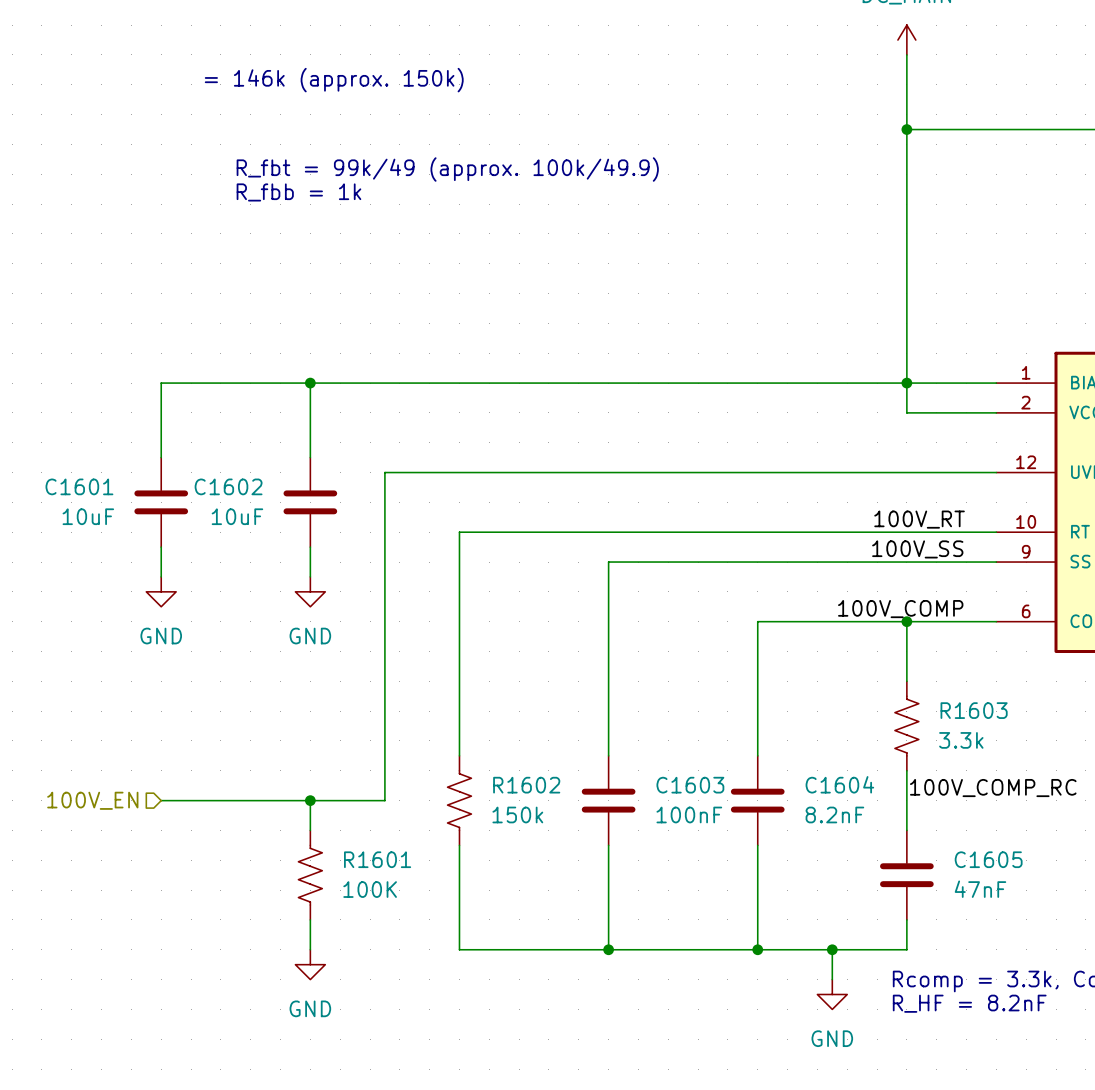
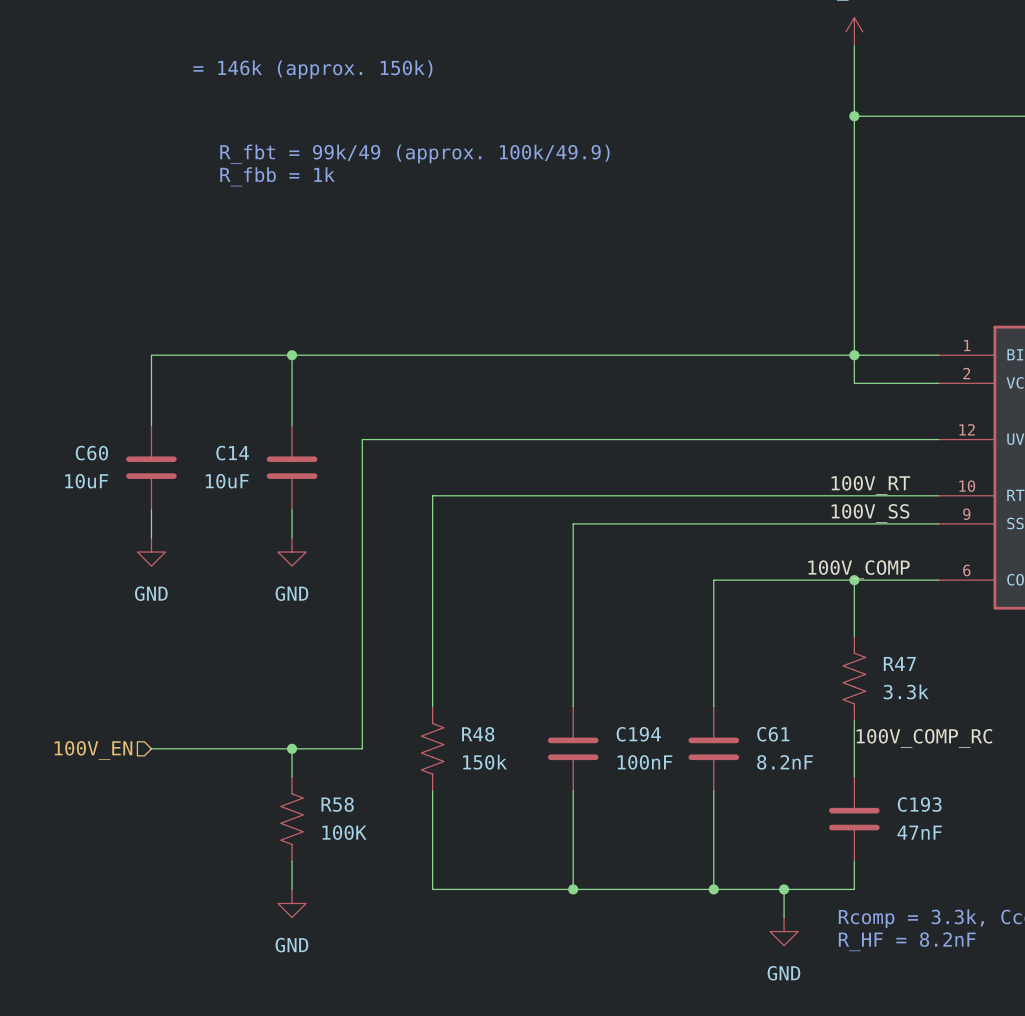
C1601 name: C1601 (79, 486) -> C60 (91, 453)
C1602 name: C1602 (228, 486) -> C14 (232, 453)
R1603 name: R1603 (974, 710) -> R47 (899, 663)
C1604 name: C1604 (839, 784) -> C61 (773, 734)
R1602 name: R1602 (526, 785) -> R48 (478, 734)
C1603 name: C1603 (690, 785) -> C194 (638, 734)
R1601 name: R1601 (377, 859) -> R58 (337, 804)
C1605 name: C1605 (988, 859) -> C193 (919, 804)

